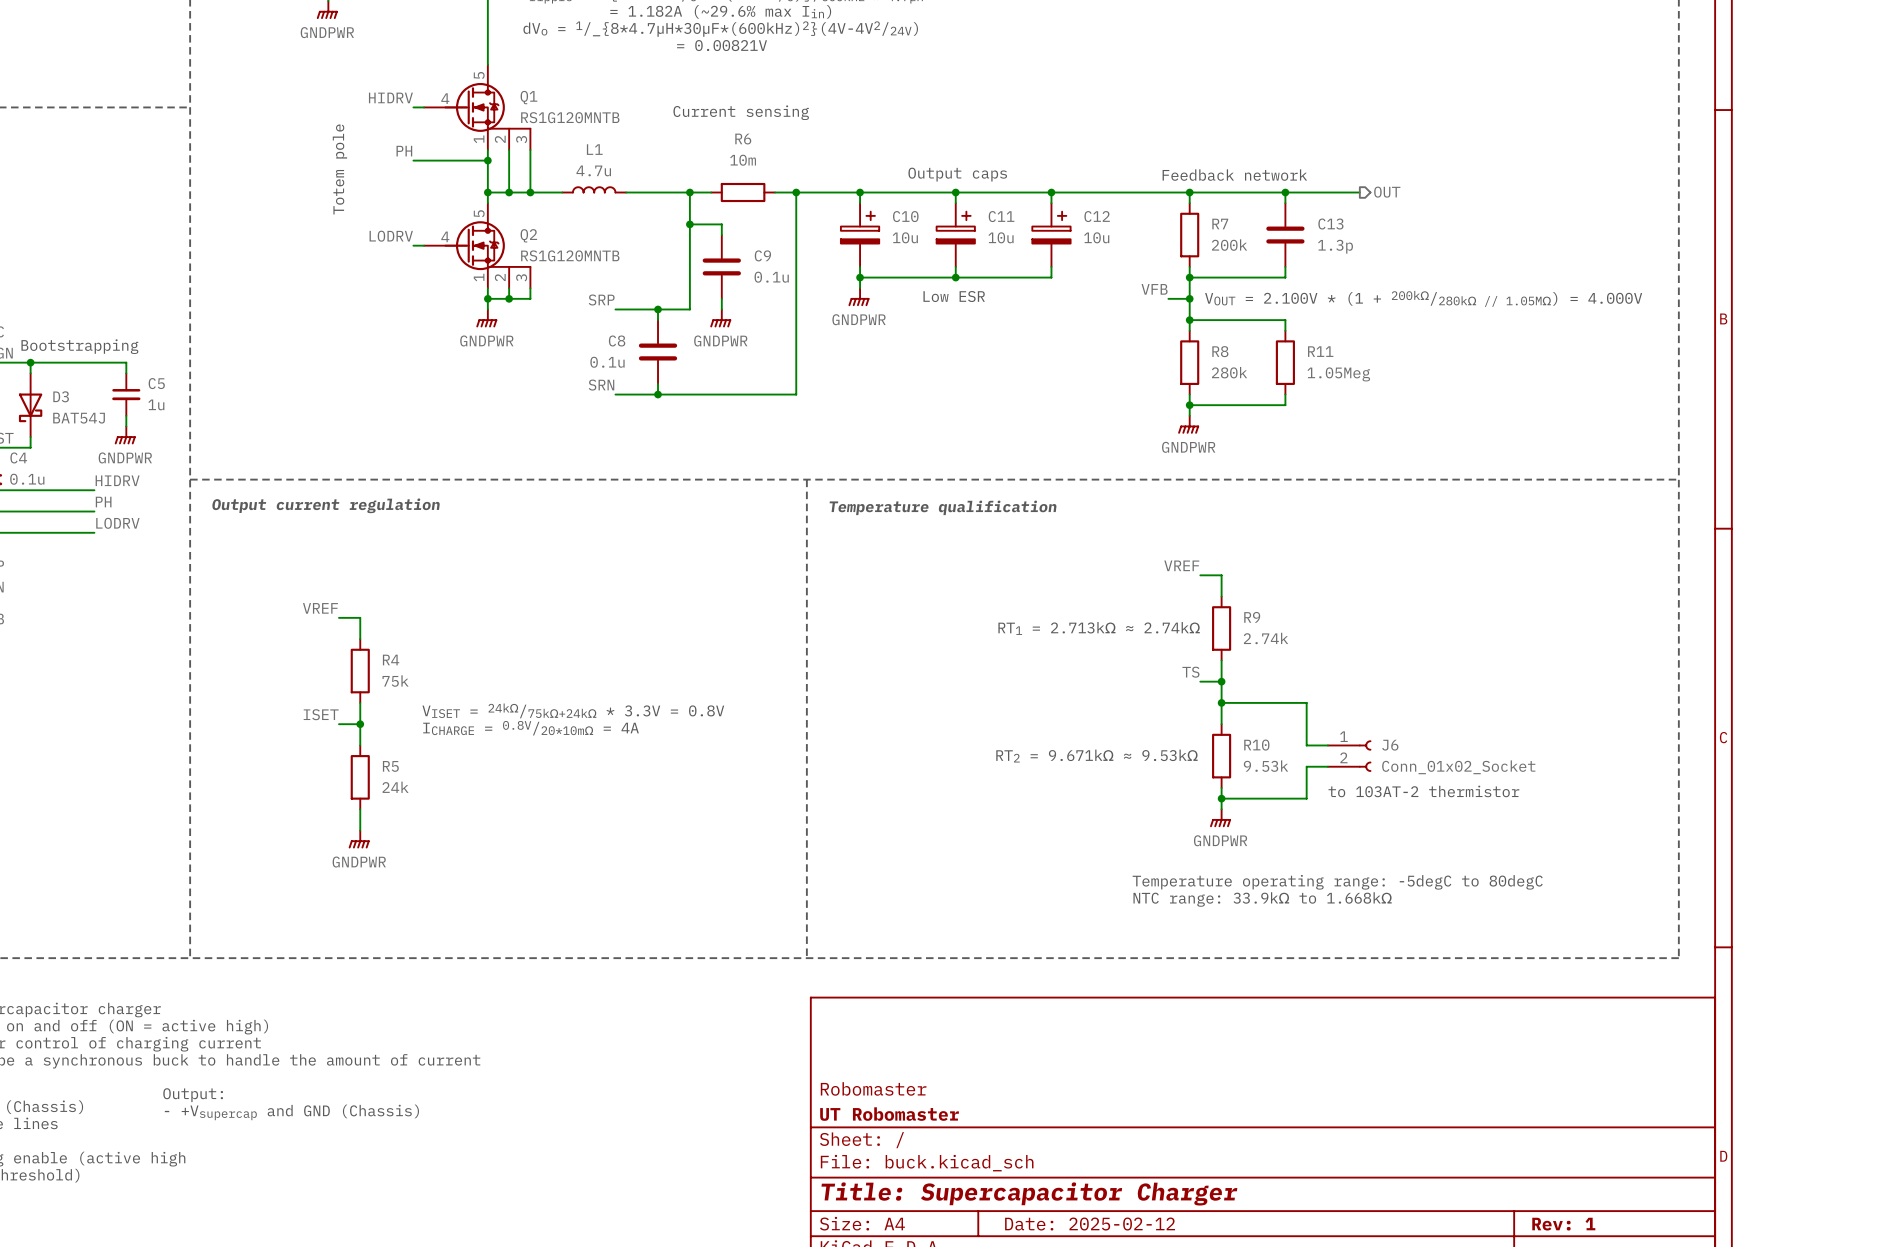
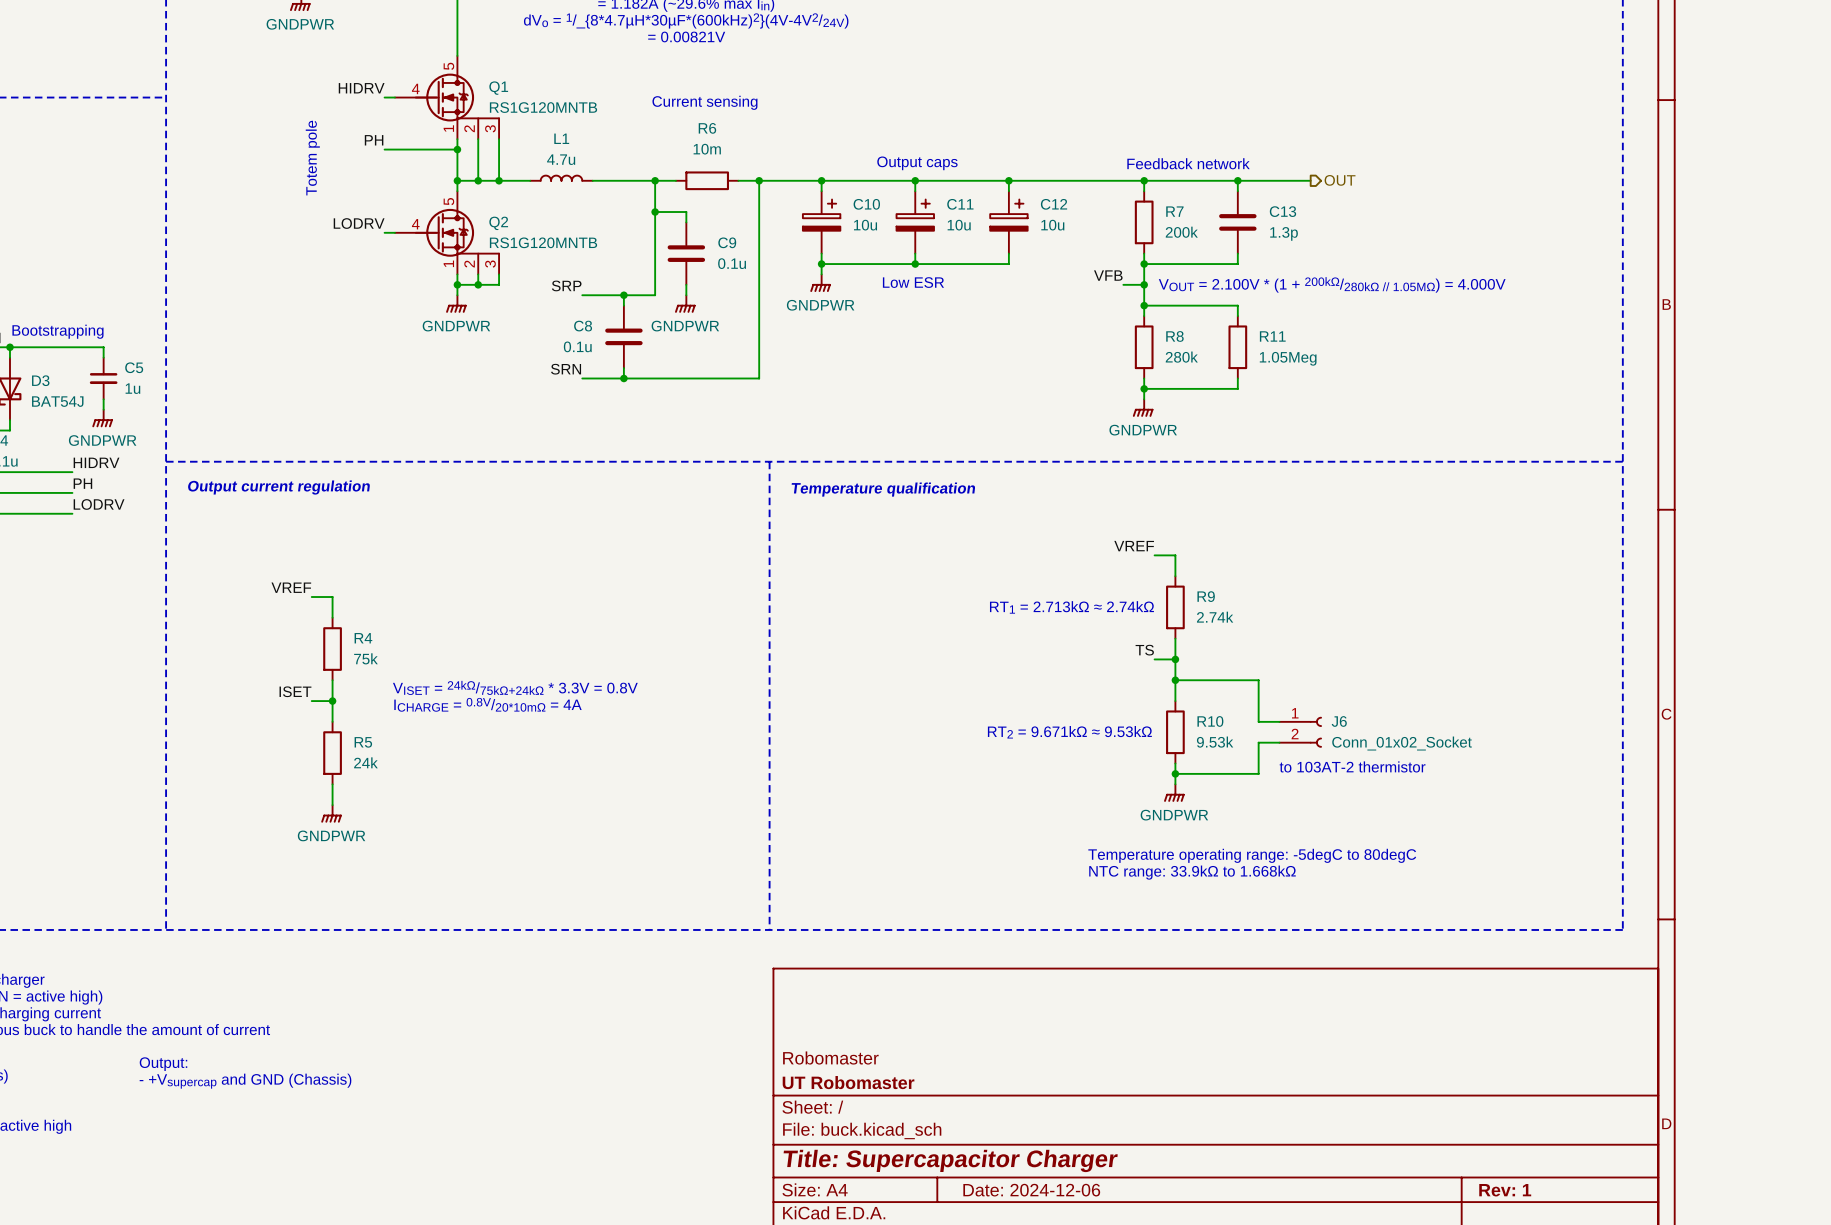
title block: Date: 2025-02-12 (1090, 1224) -> Date: 2024-12-06 (1031, 1190)

